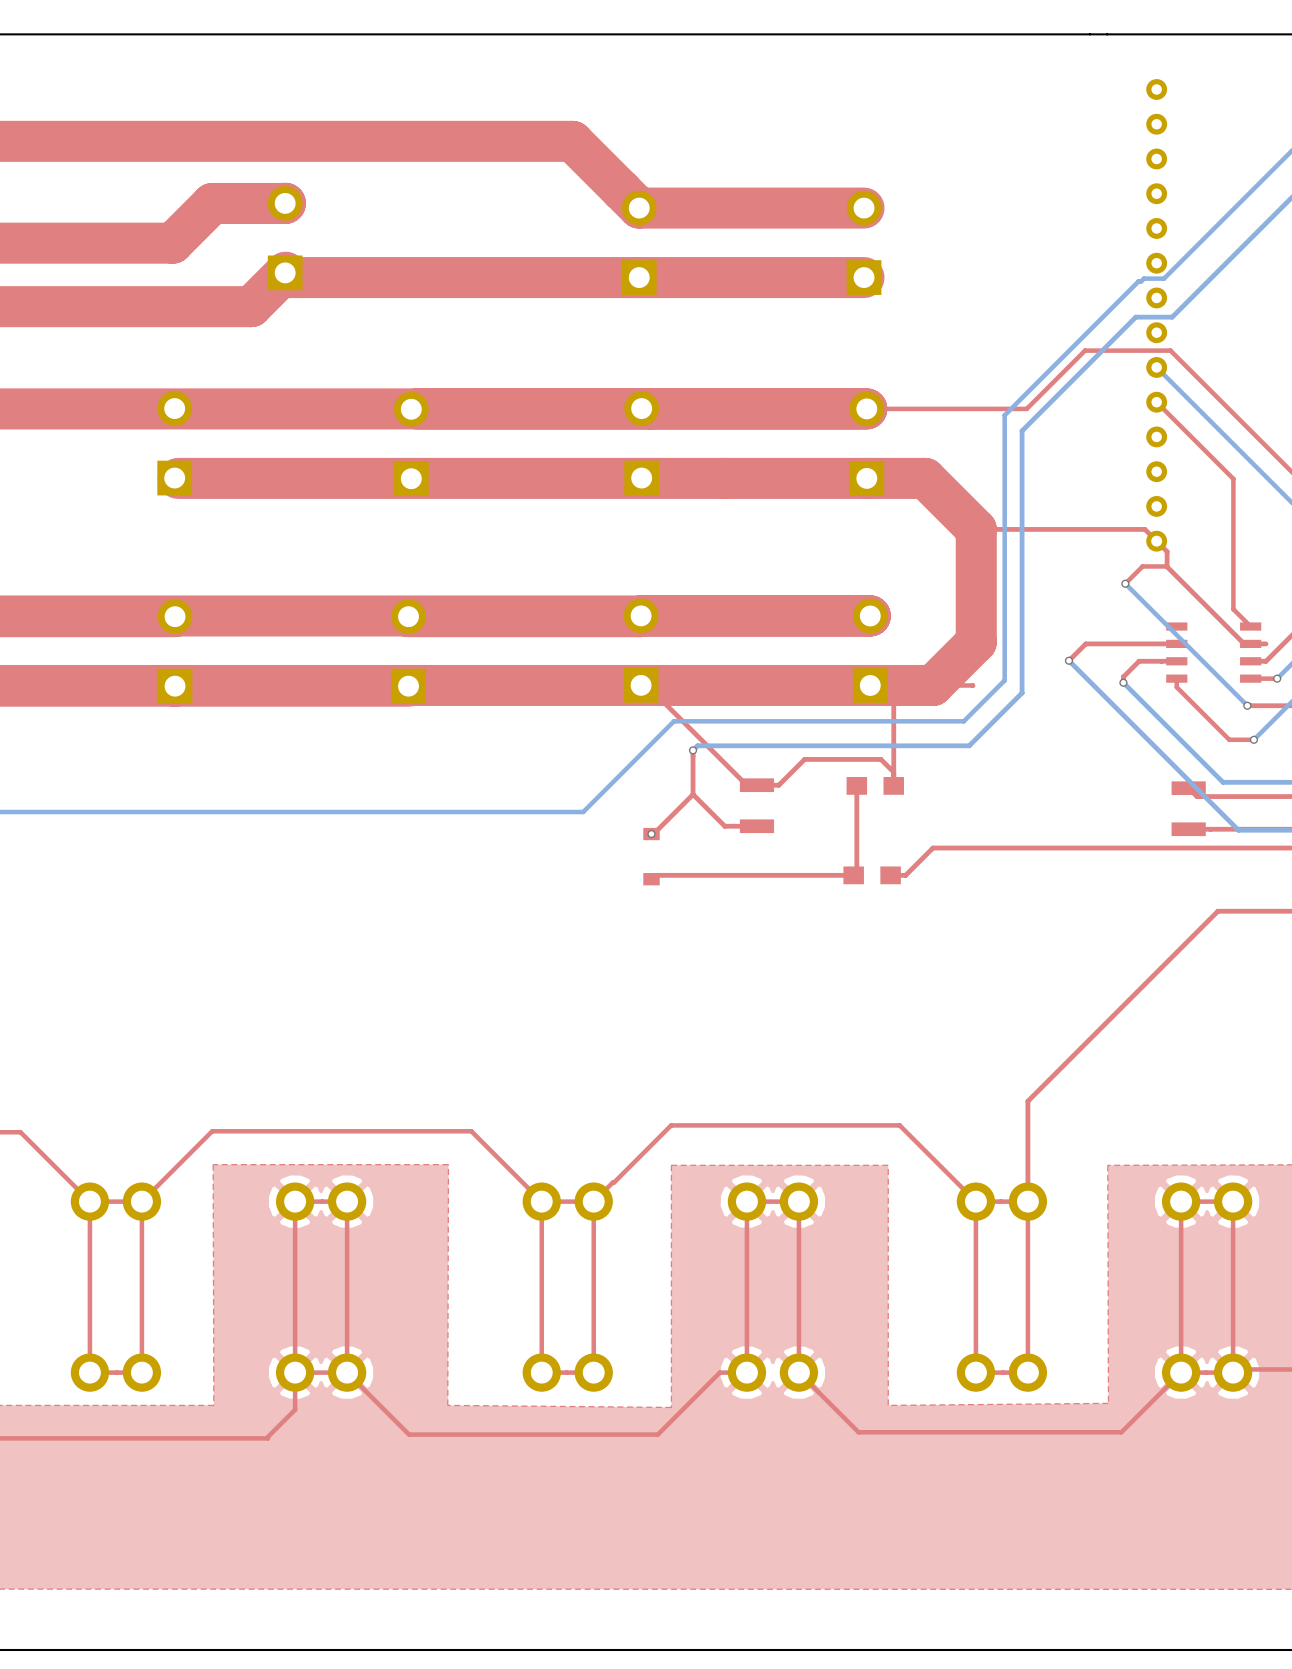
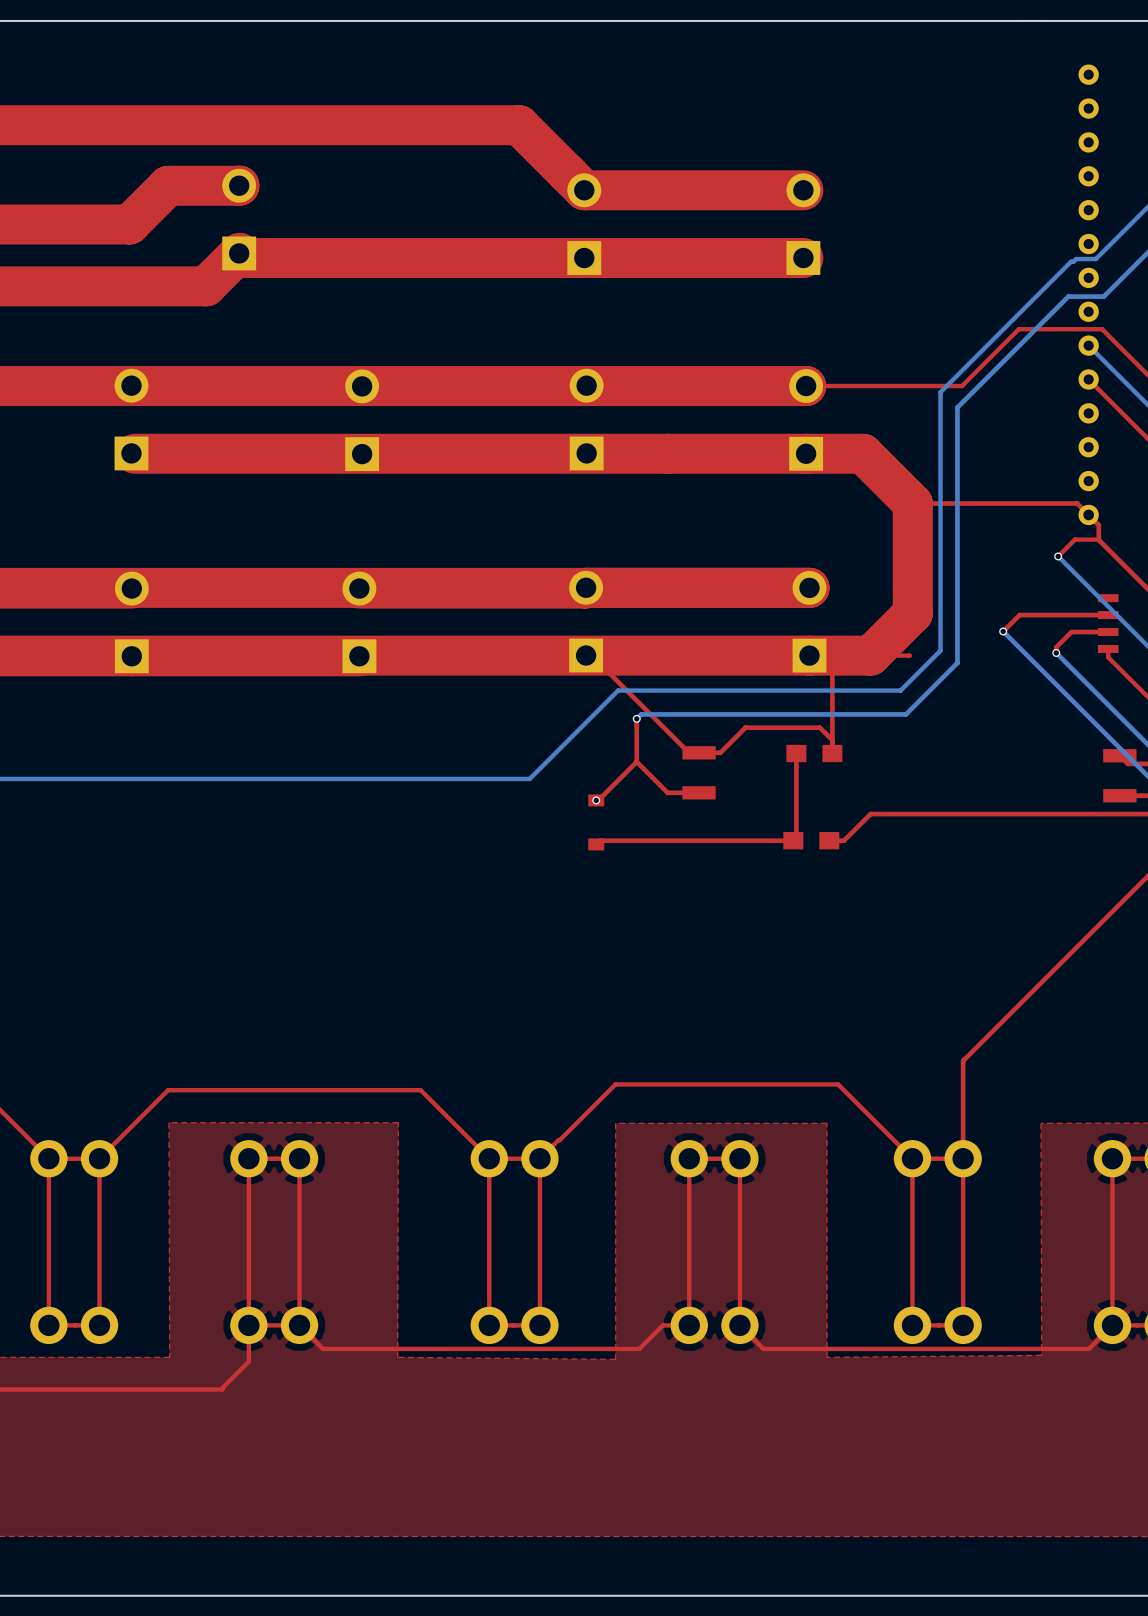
top track: (695, 1396) (657, 1434) (409, 1434) (371, 1396) -> (639, 1348) (323, 1348)
top track: (1156, 1396) (1121, 1432) (858, 1432) (823, 1396) -> (1088, 1348) (763, 1348)

